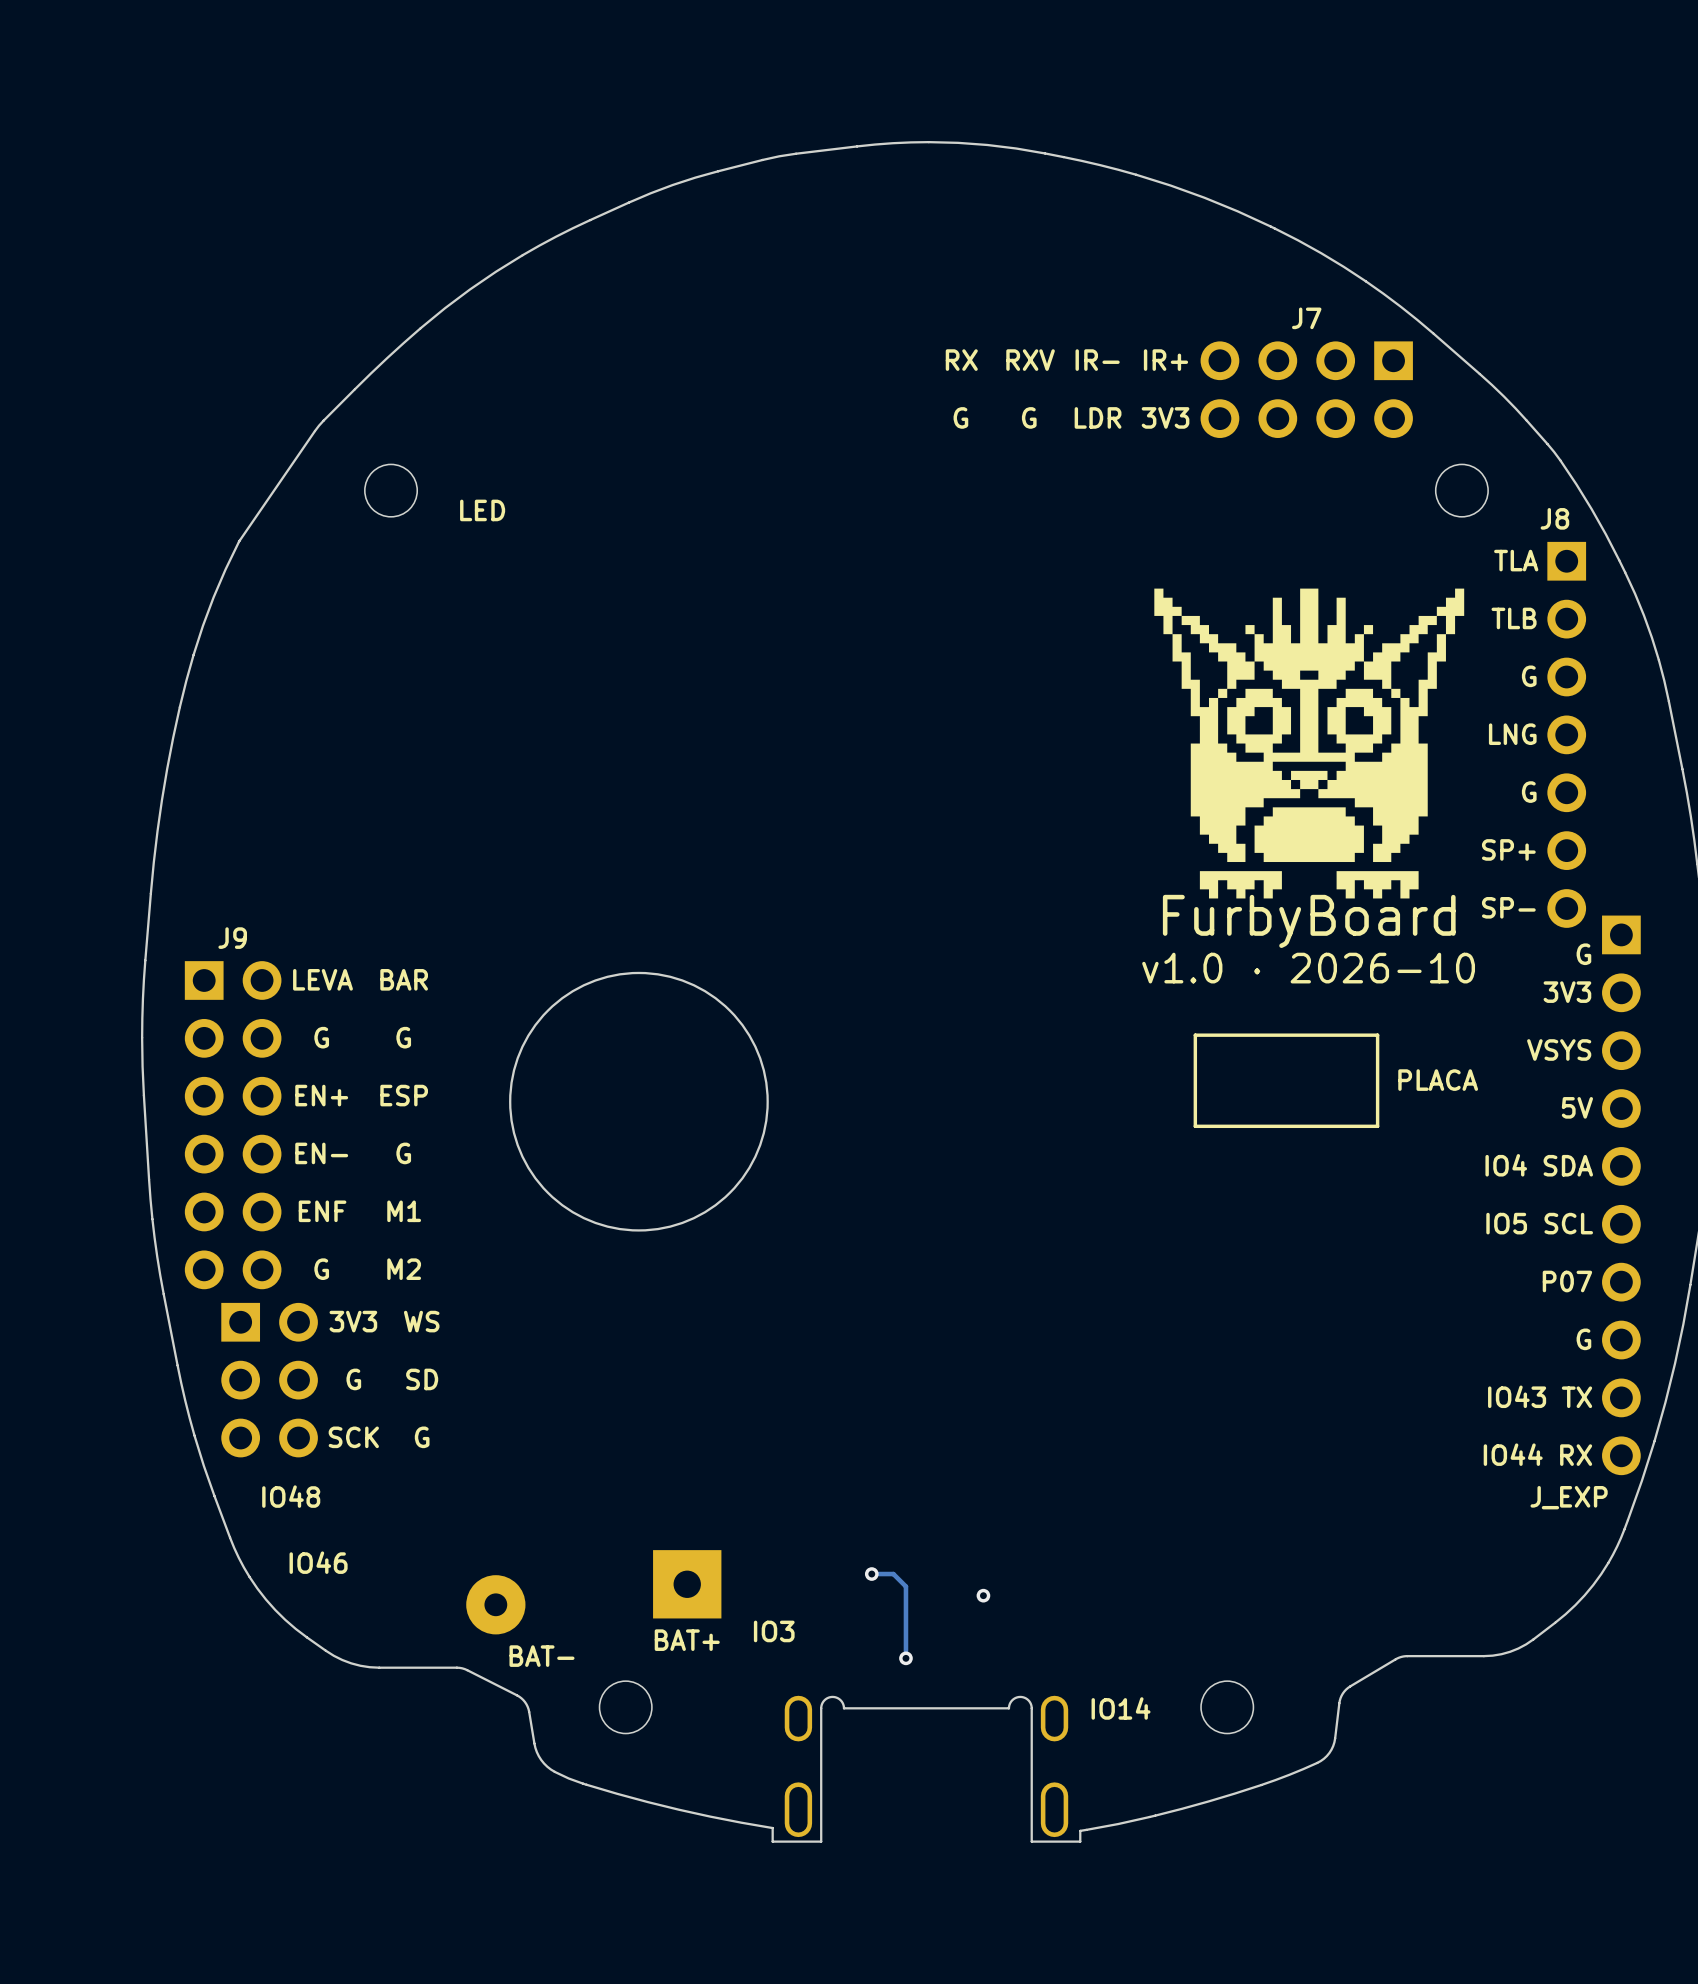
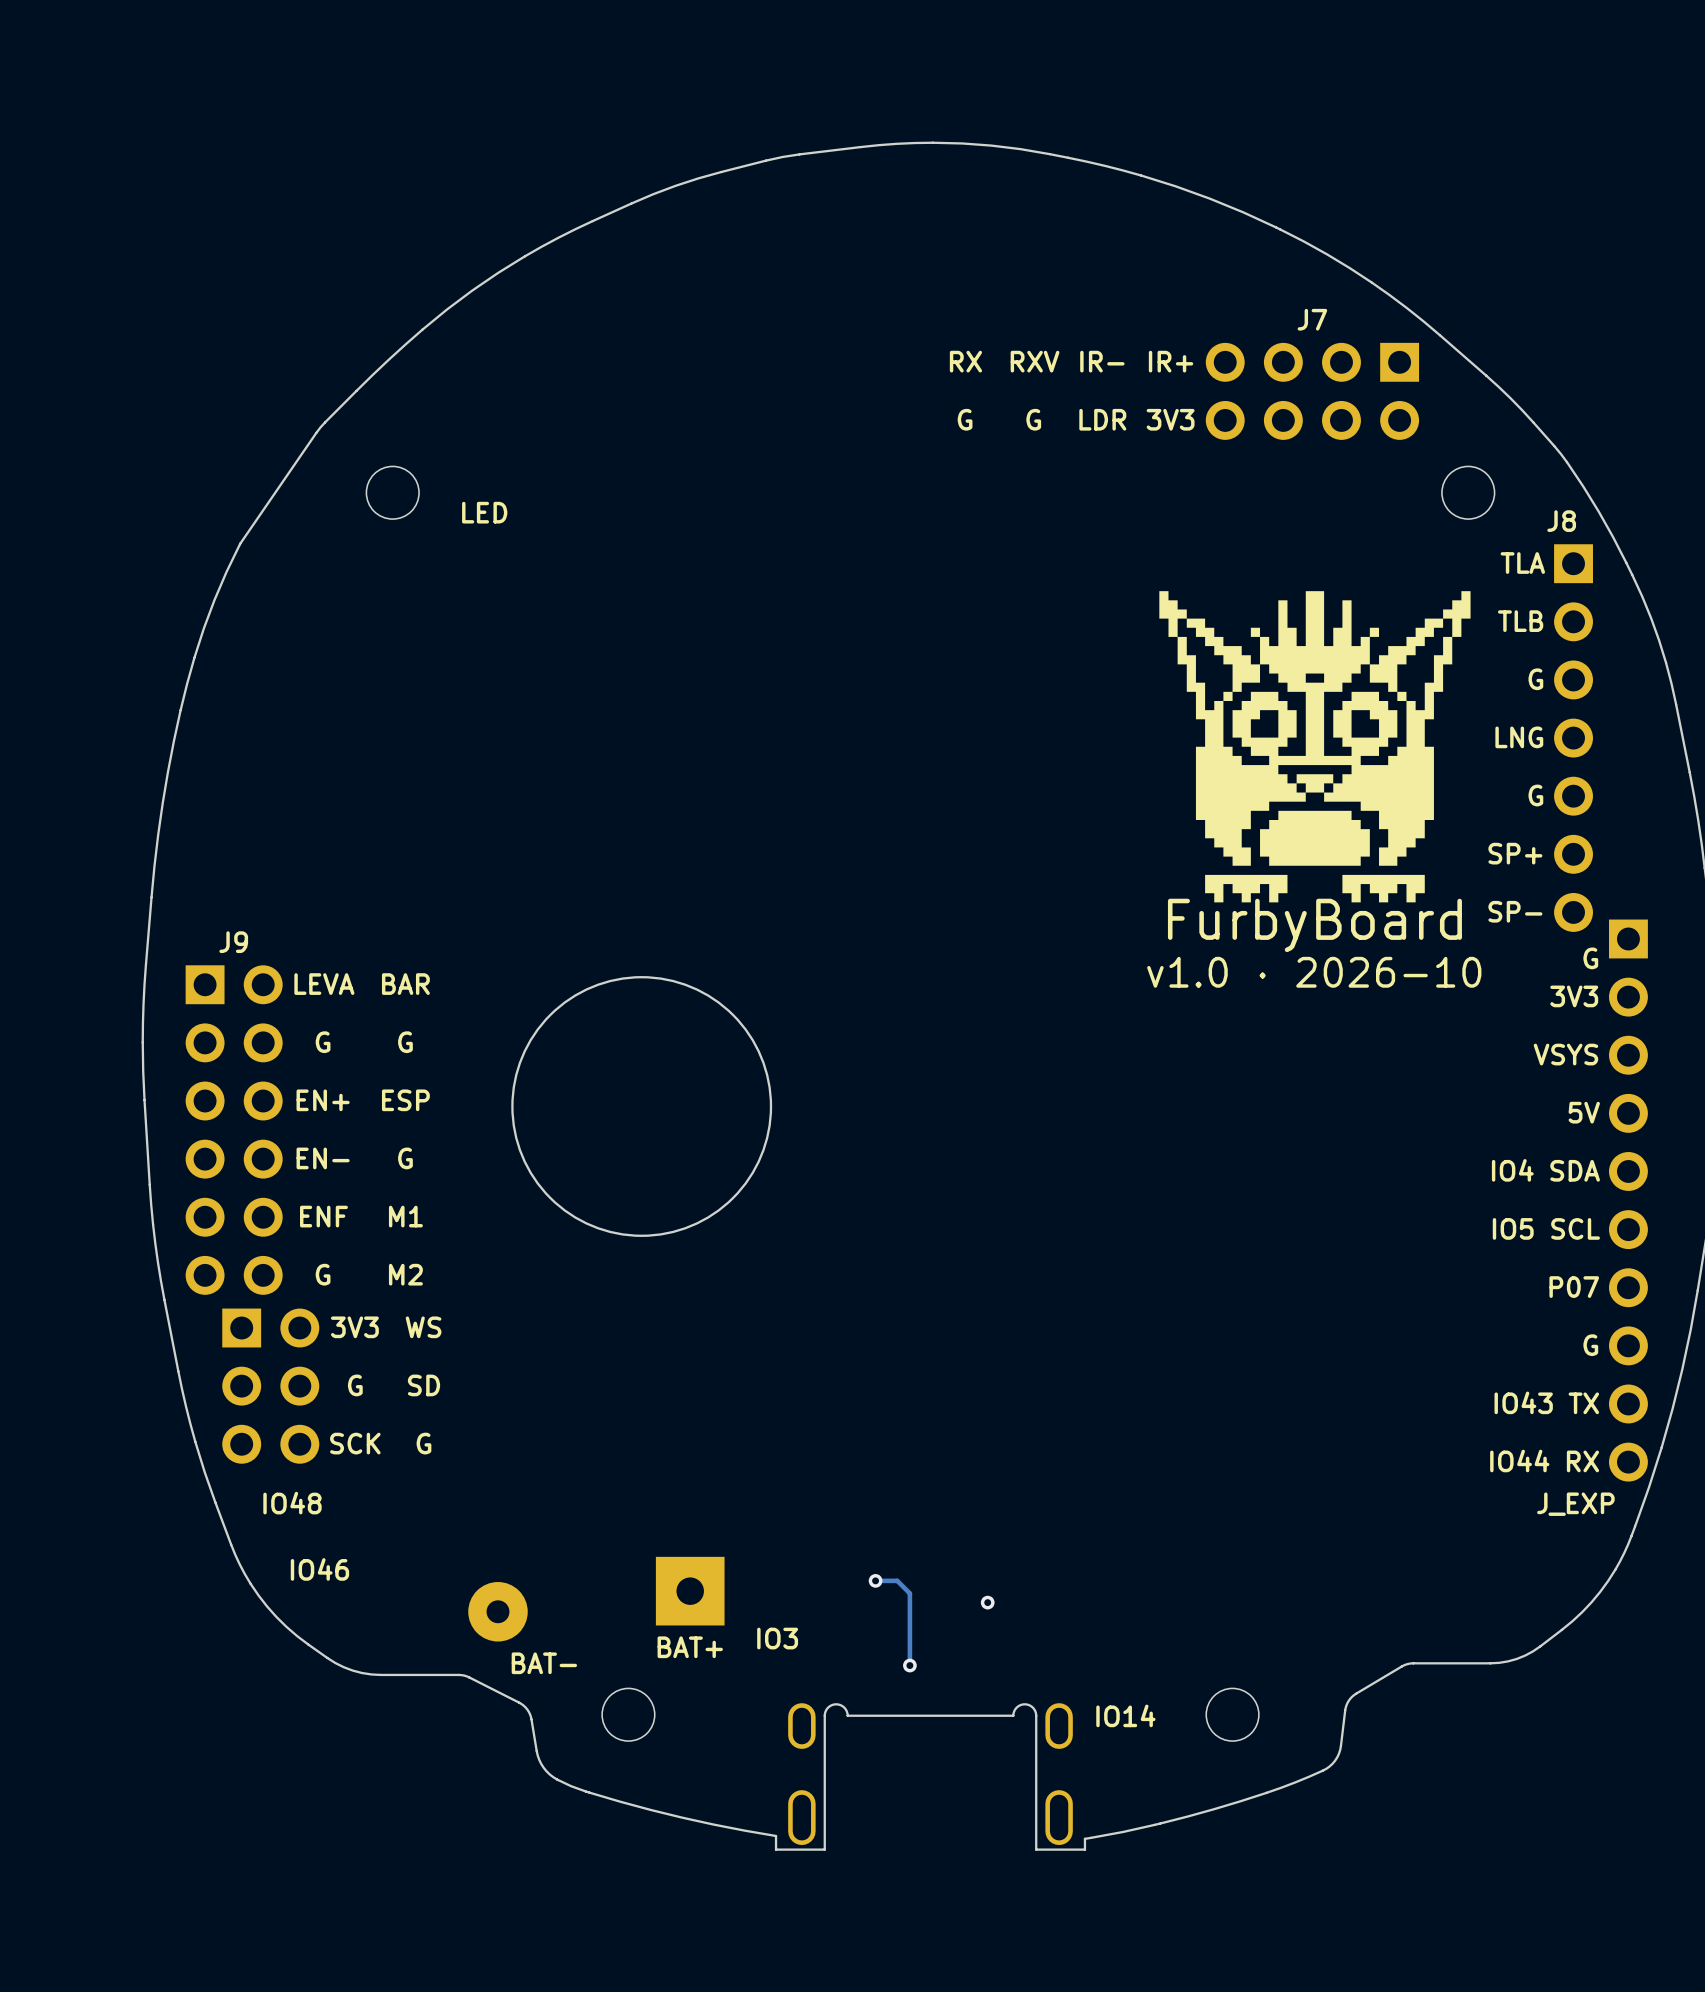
line: (1377, 1035) (1377, 1126) (1195, 1126) (1195, 1035) (1377, 1035) -> none
text: PLACA (1438, 1080) -> none

